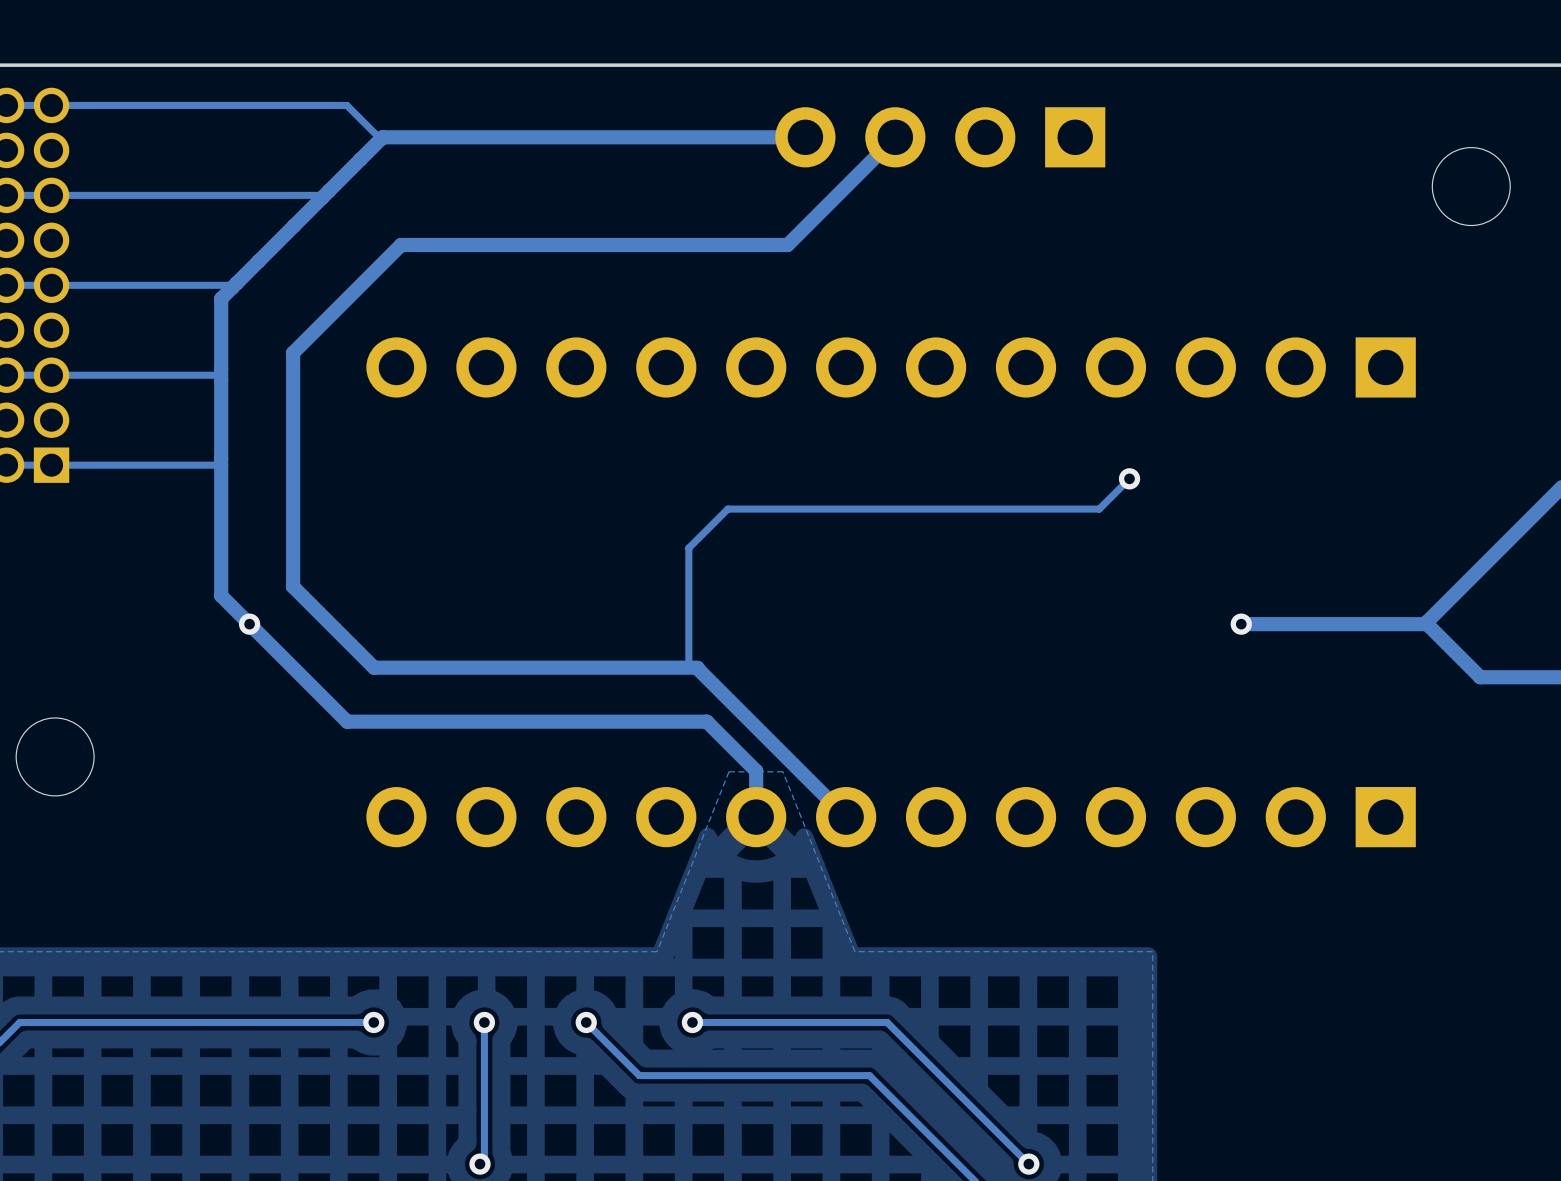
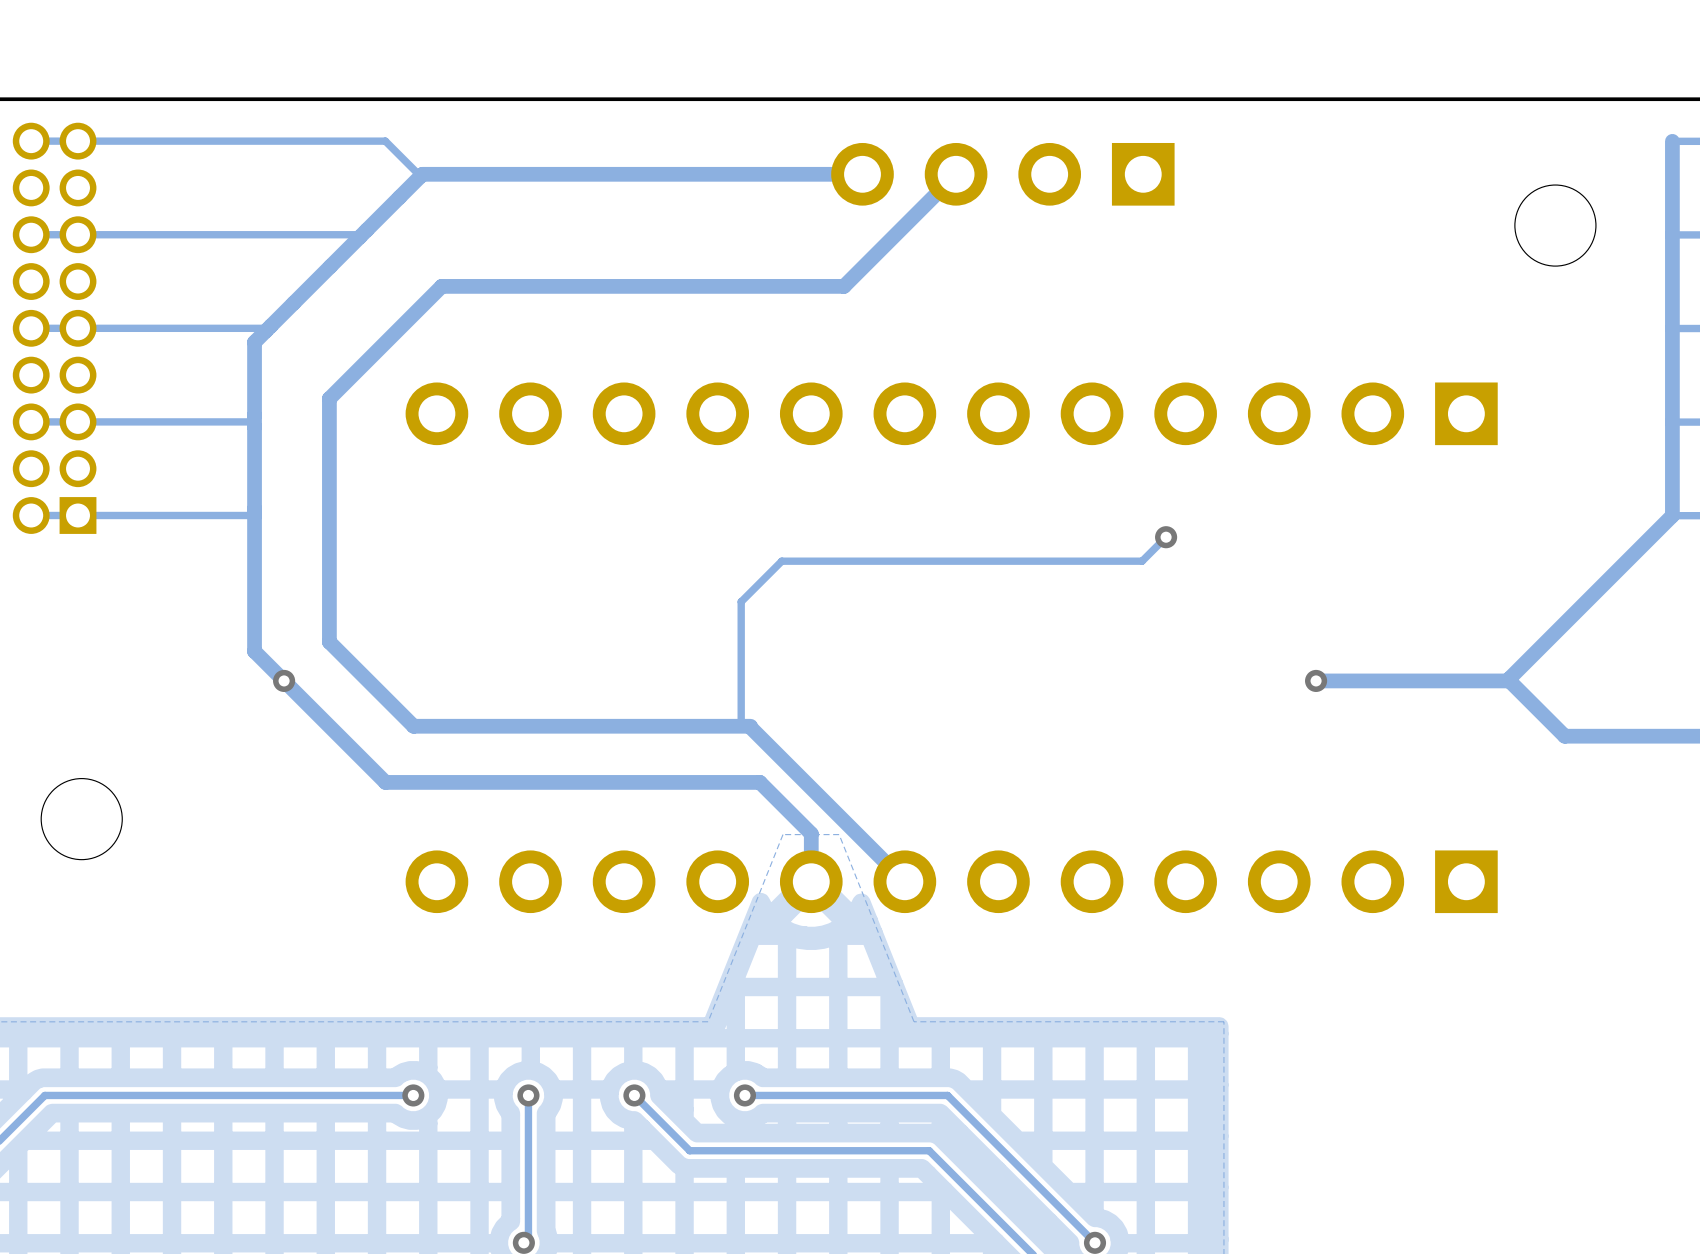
track: (1129, 478) (1099, 509) (1074, 509) -> (1166, 537) (1142, 561)
via position: (1129, 478) -> (1166, 537)

